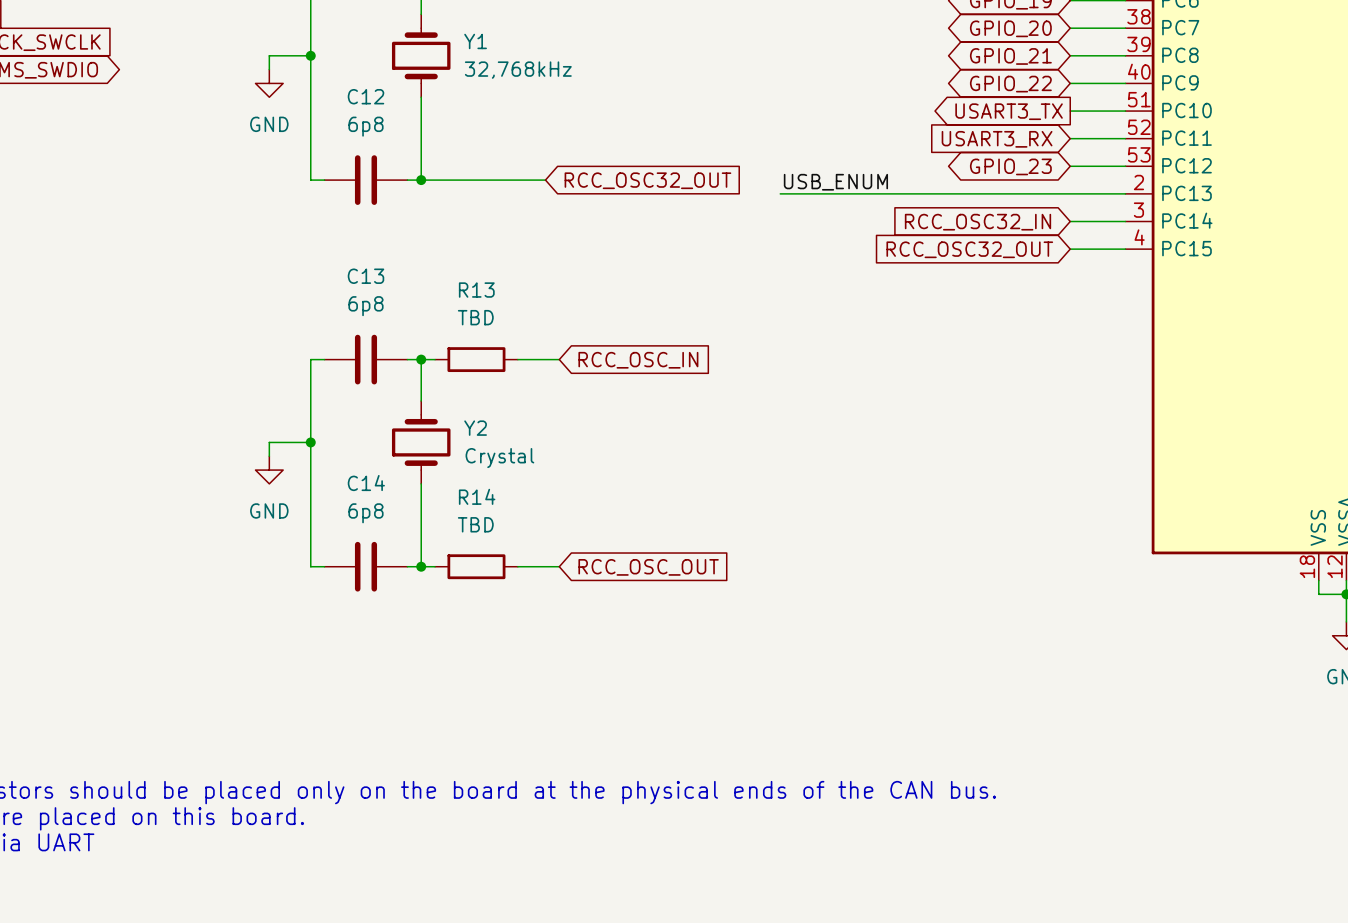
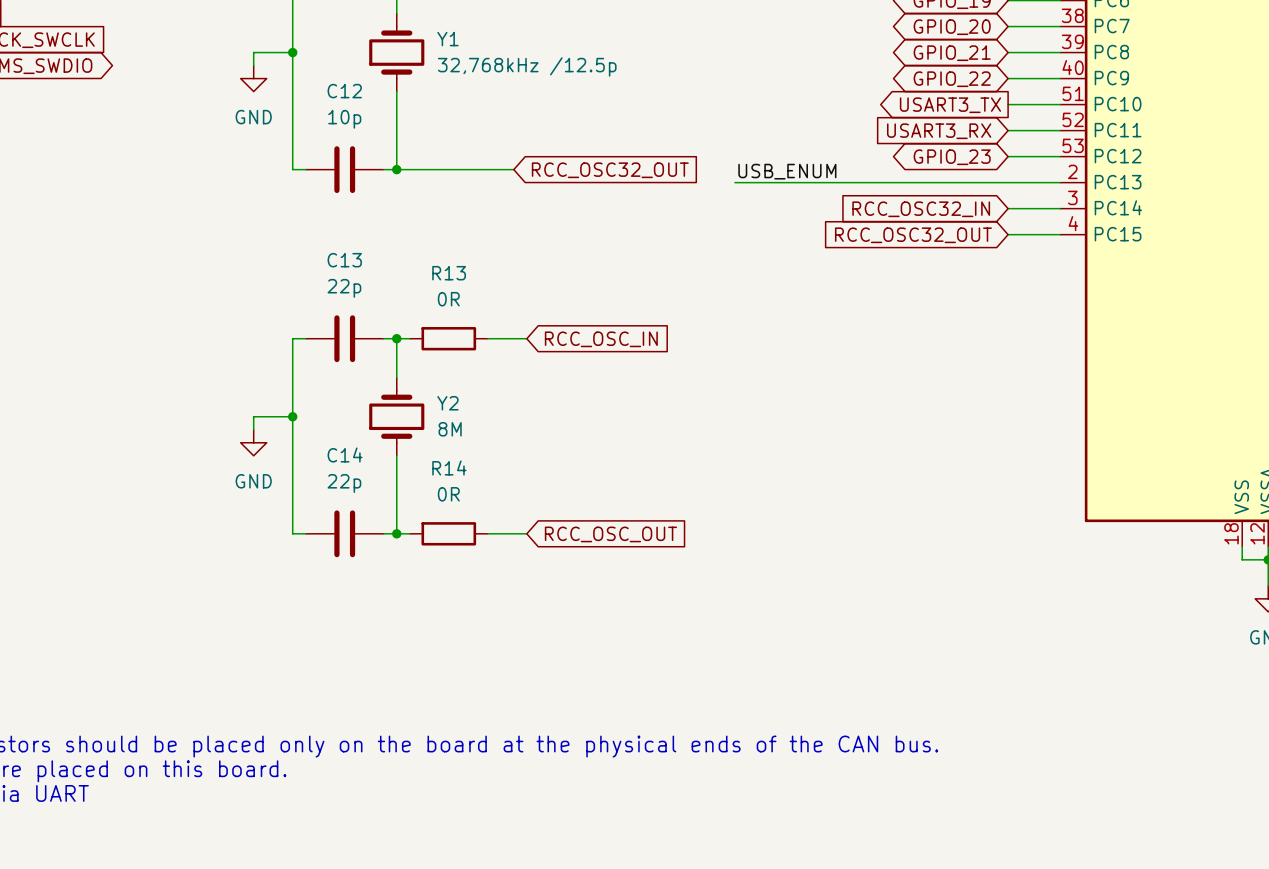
Y1 value: 32,768kHz (518, 70) -> 32,768kHz /12.5p (527, 66)
C12 value: 6p8 (365, 126) -> 10p (344, 119)
C13 value: 6p8 (365, 306) -> 22p (344, 288)
R13 value: TBD (475, 317) -> 0R (448, 299)
Y2 value: Crystal (499, 458) -> 8M (450, 429)
C14 value: 6p8 (365, 513) -> 22p (344, 483)
R14 value: TBD (475, 524) -> 0R (448, 494)

